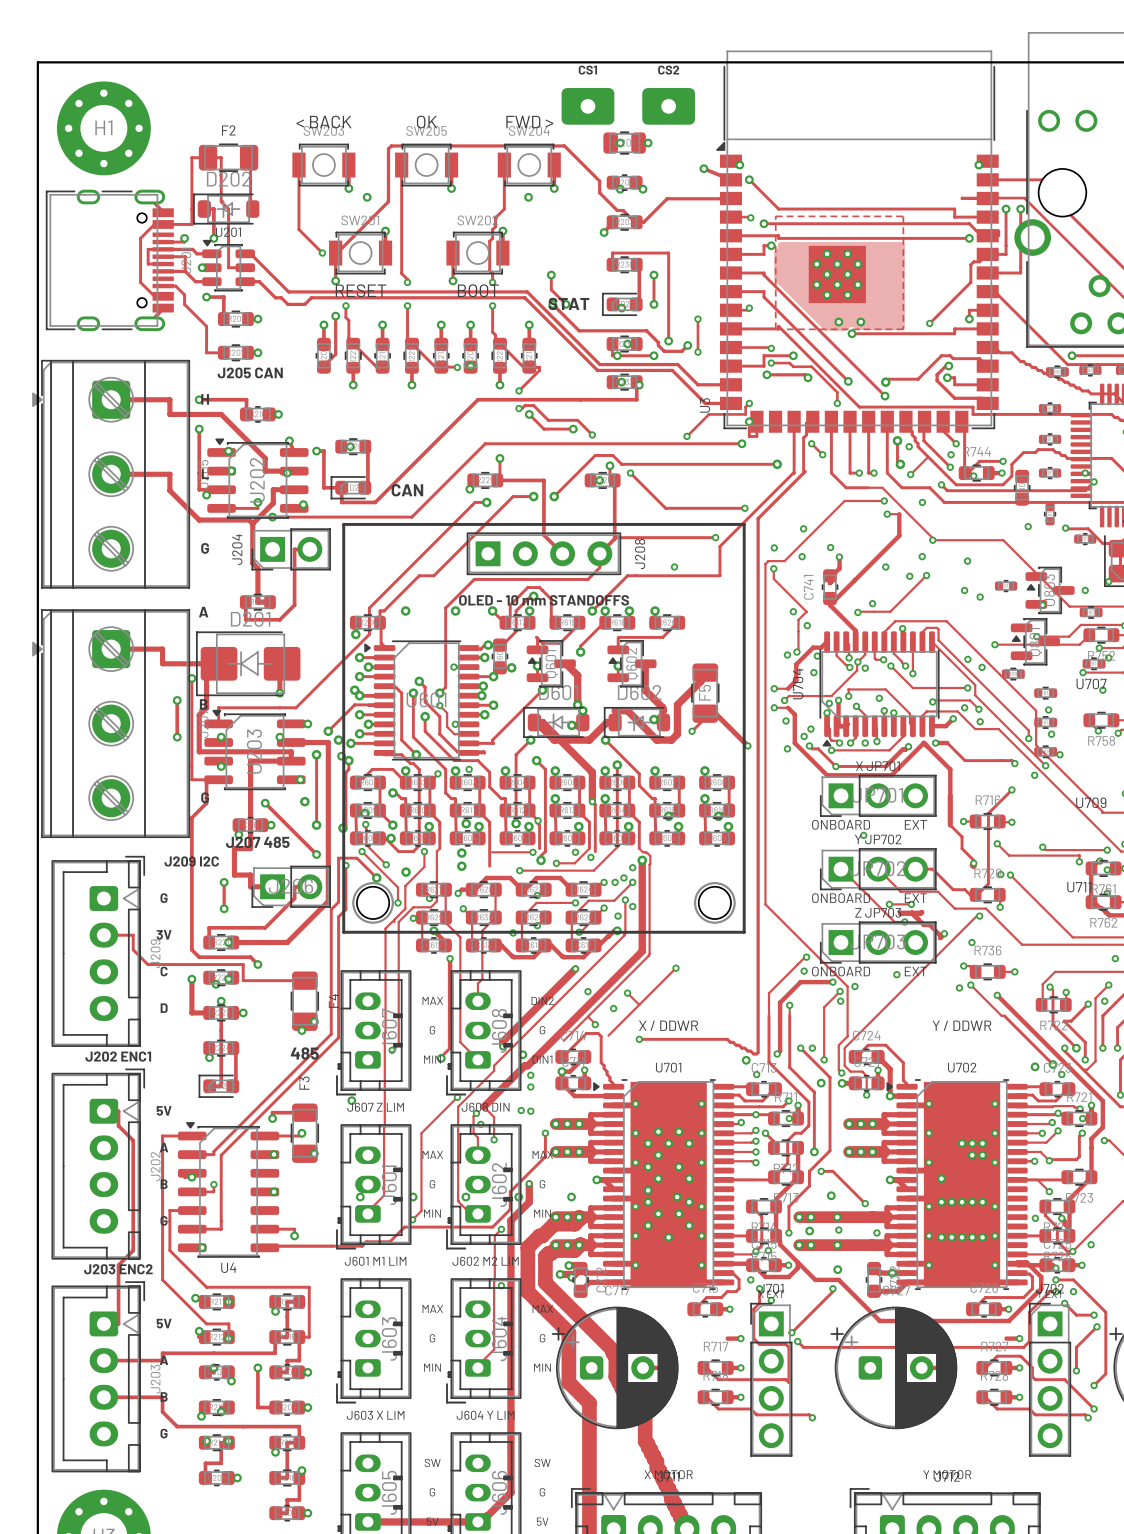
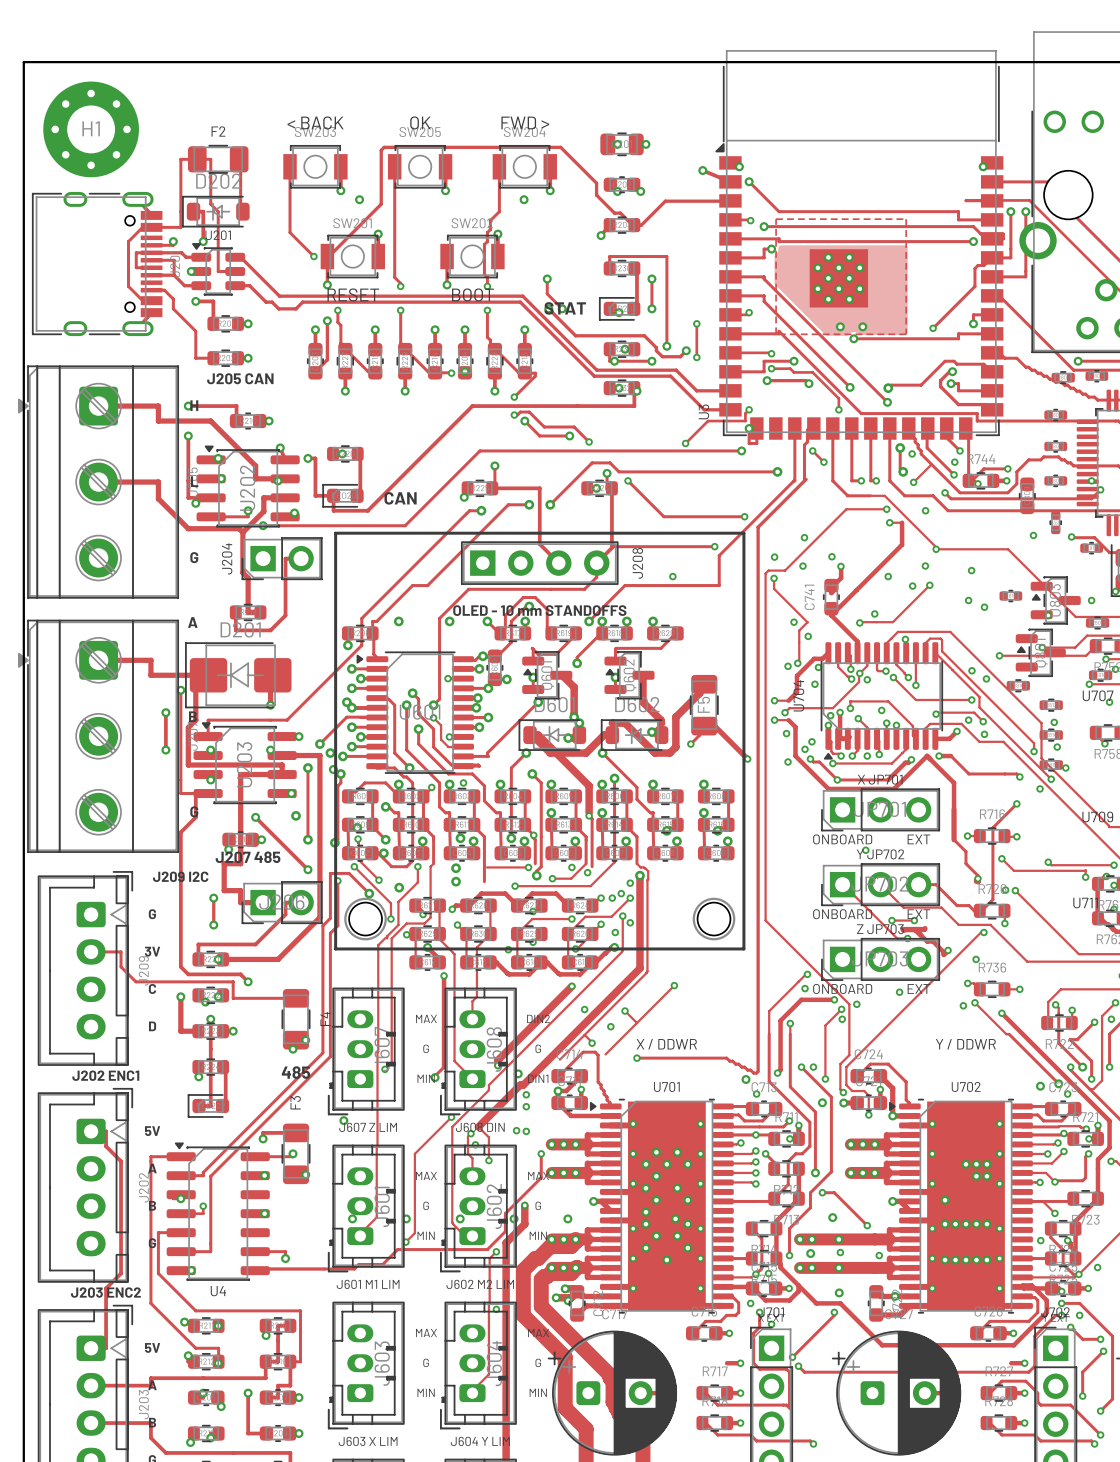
text: CS1 (587, 70) -> none
text: CS2 (668, 70) -> none
part: (587, 106) -> none
part: (668, 106) -> none

